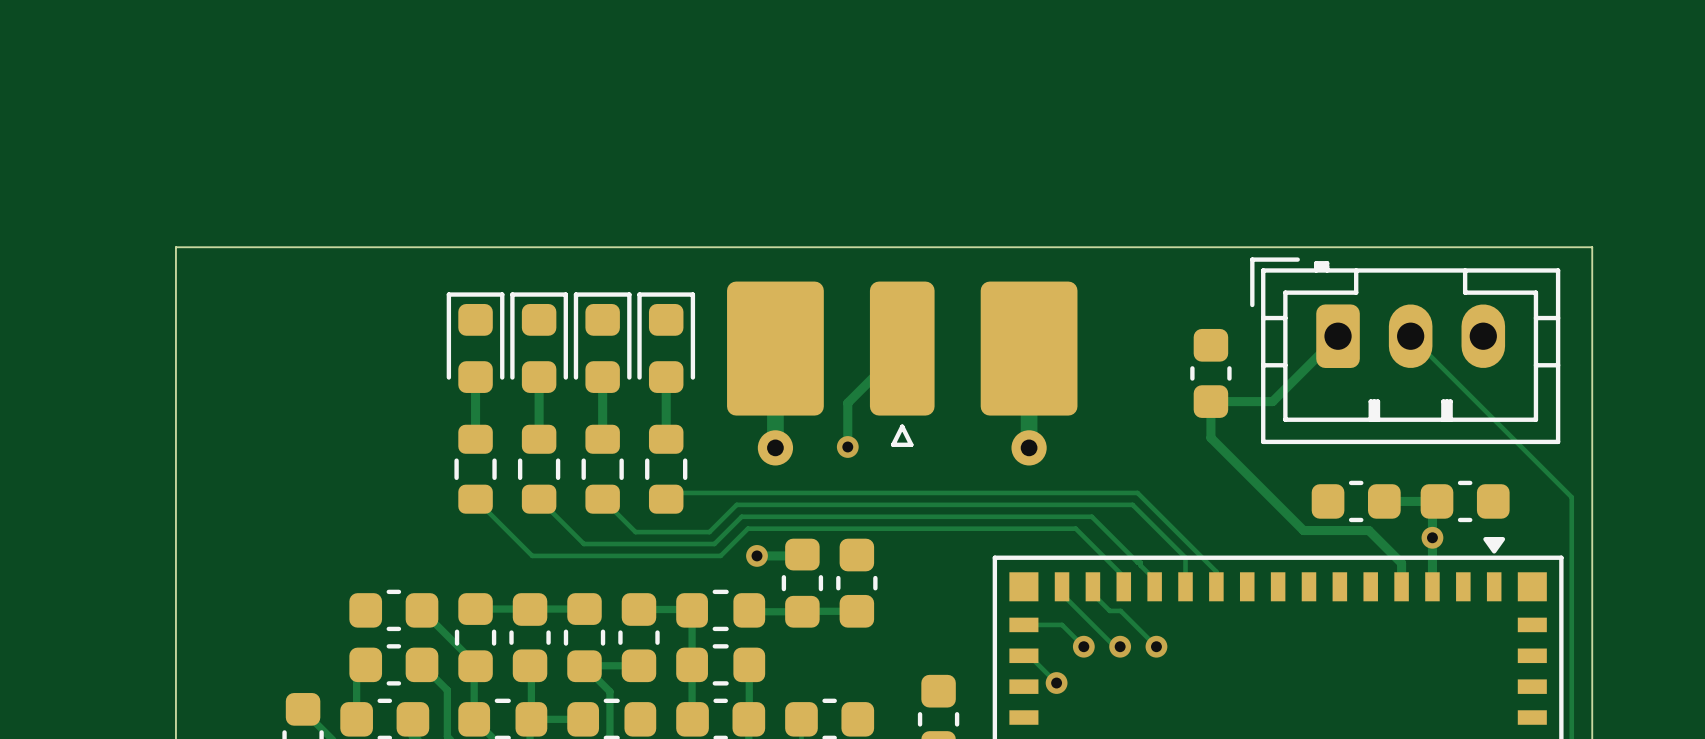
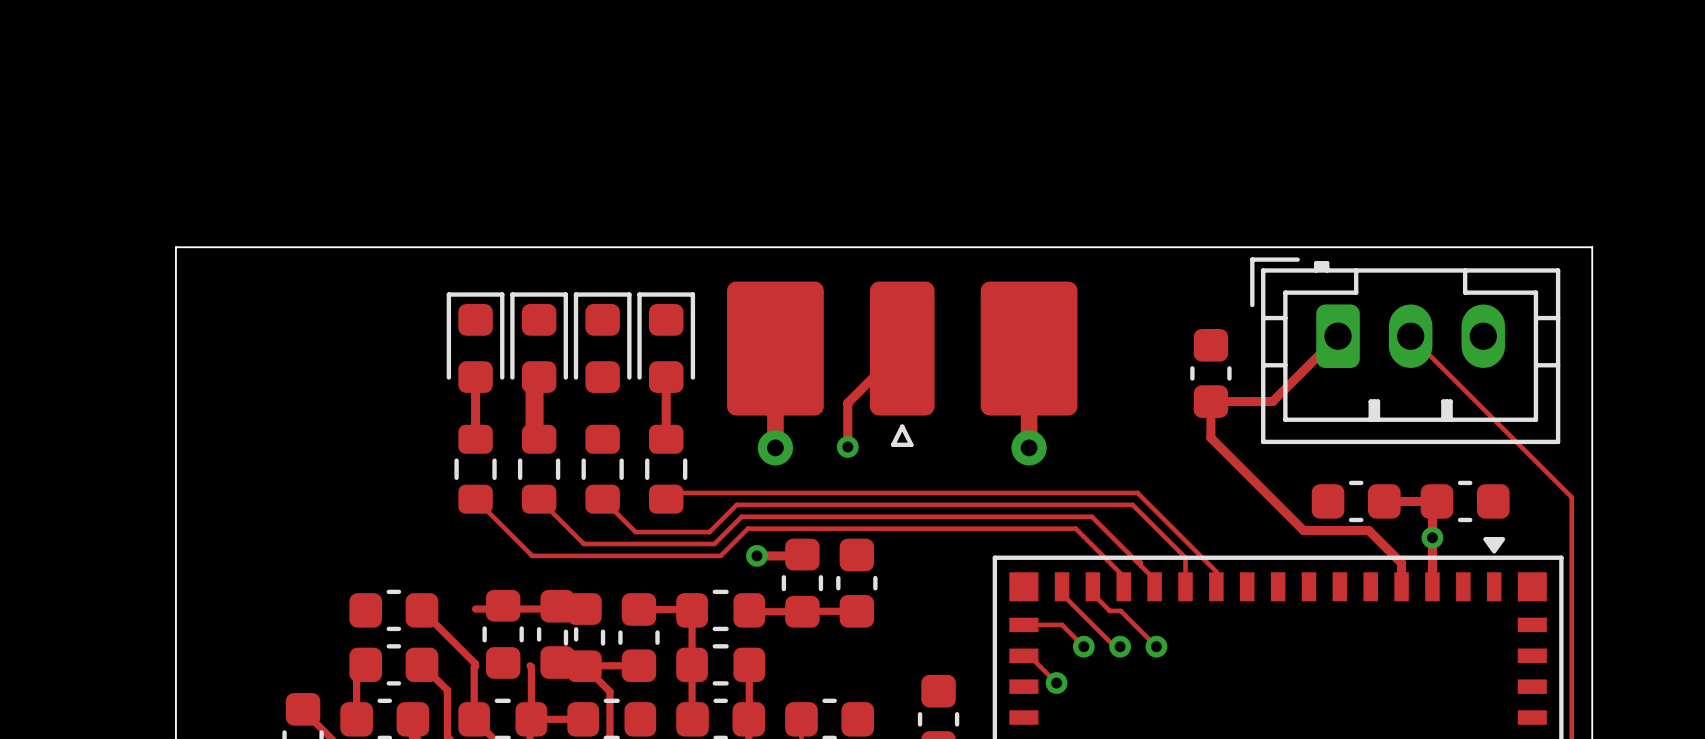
track: (602, 377) (602, 439) -> (530, 384) (530, 446)
part position: (475, 637) -> (503, 634)
part position: (530, 637) -> (557, 634)

